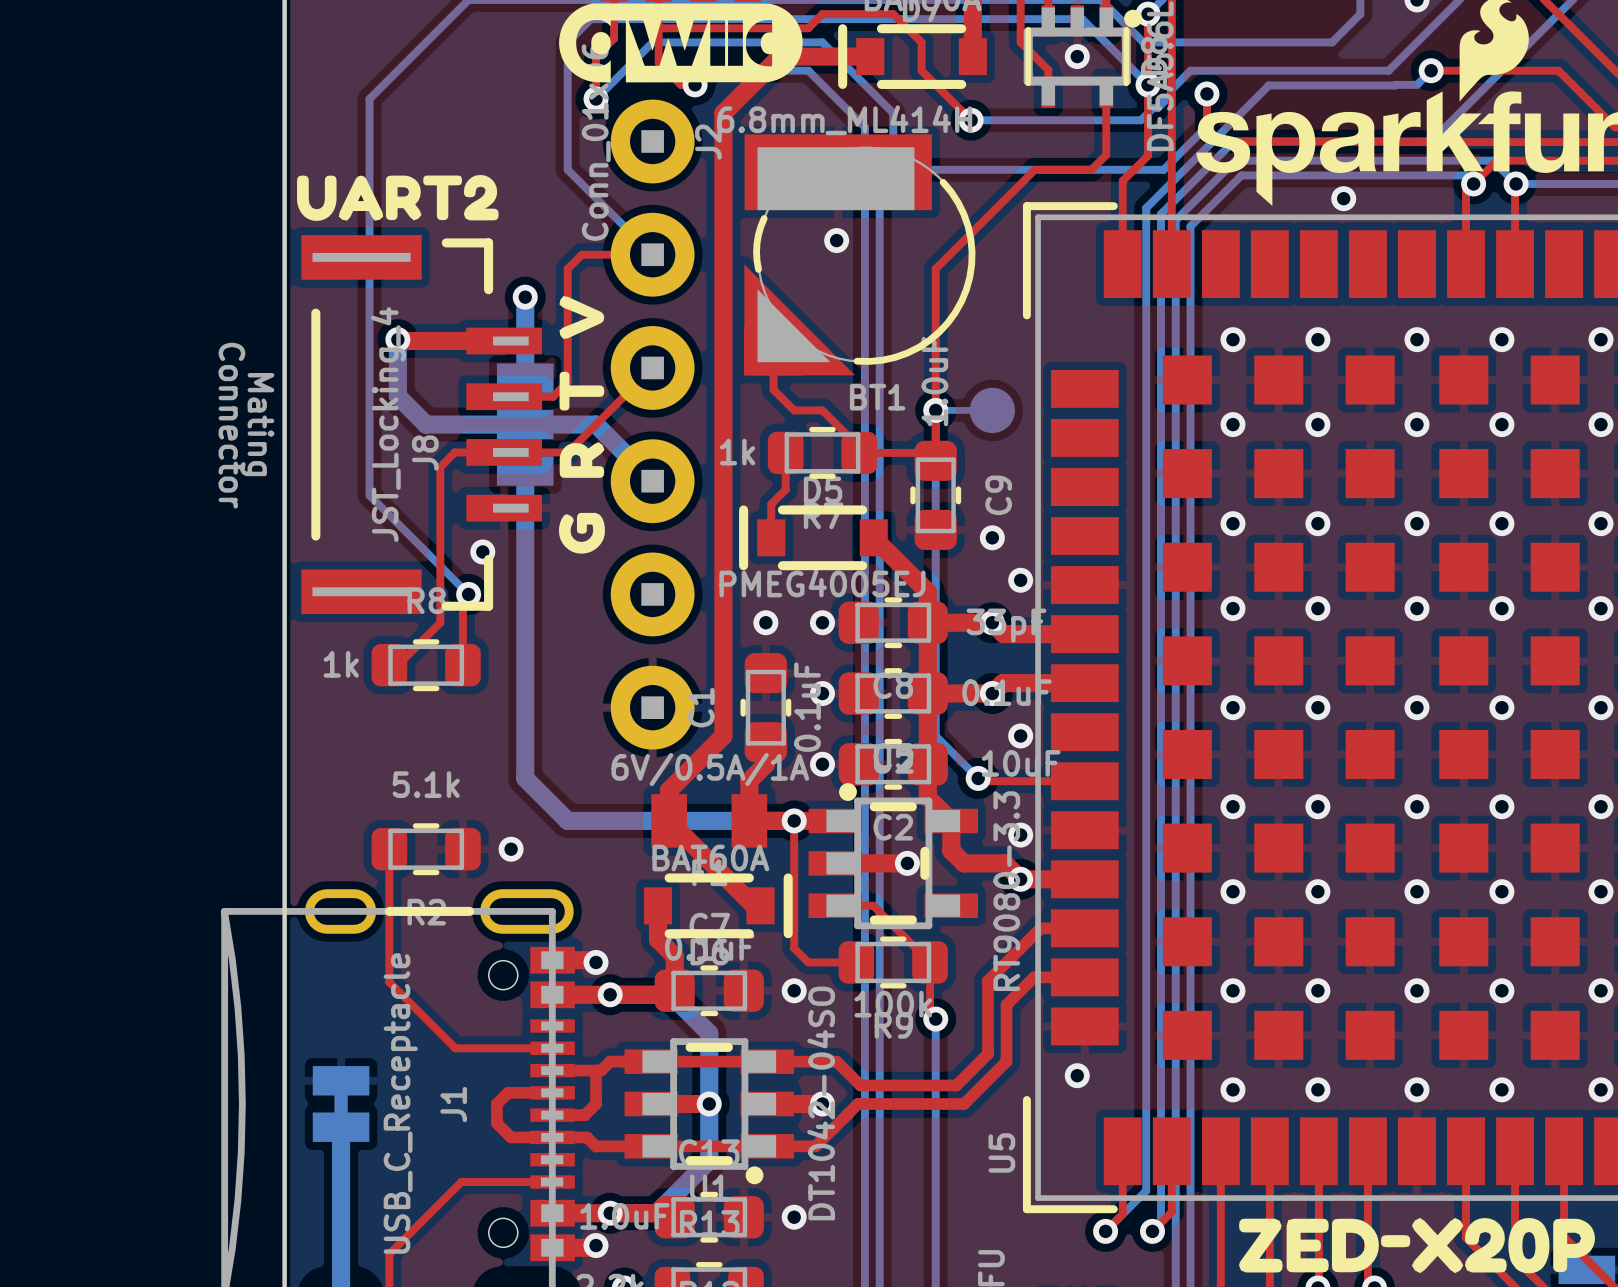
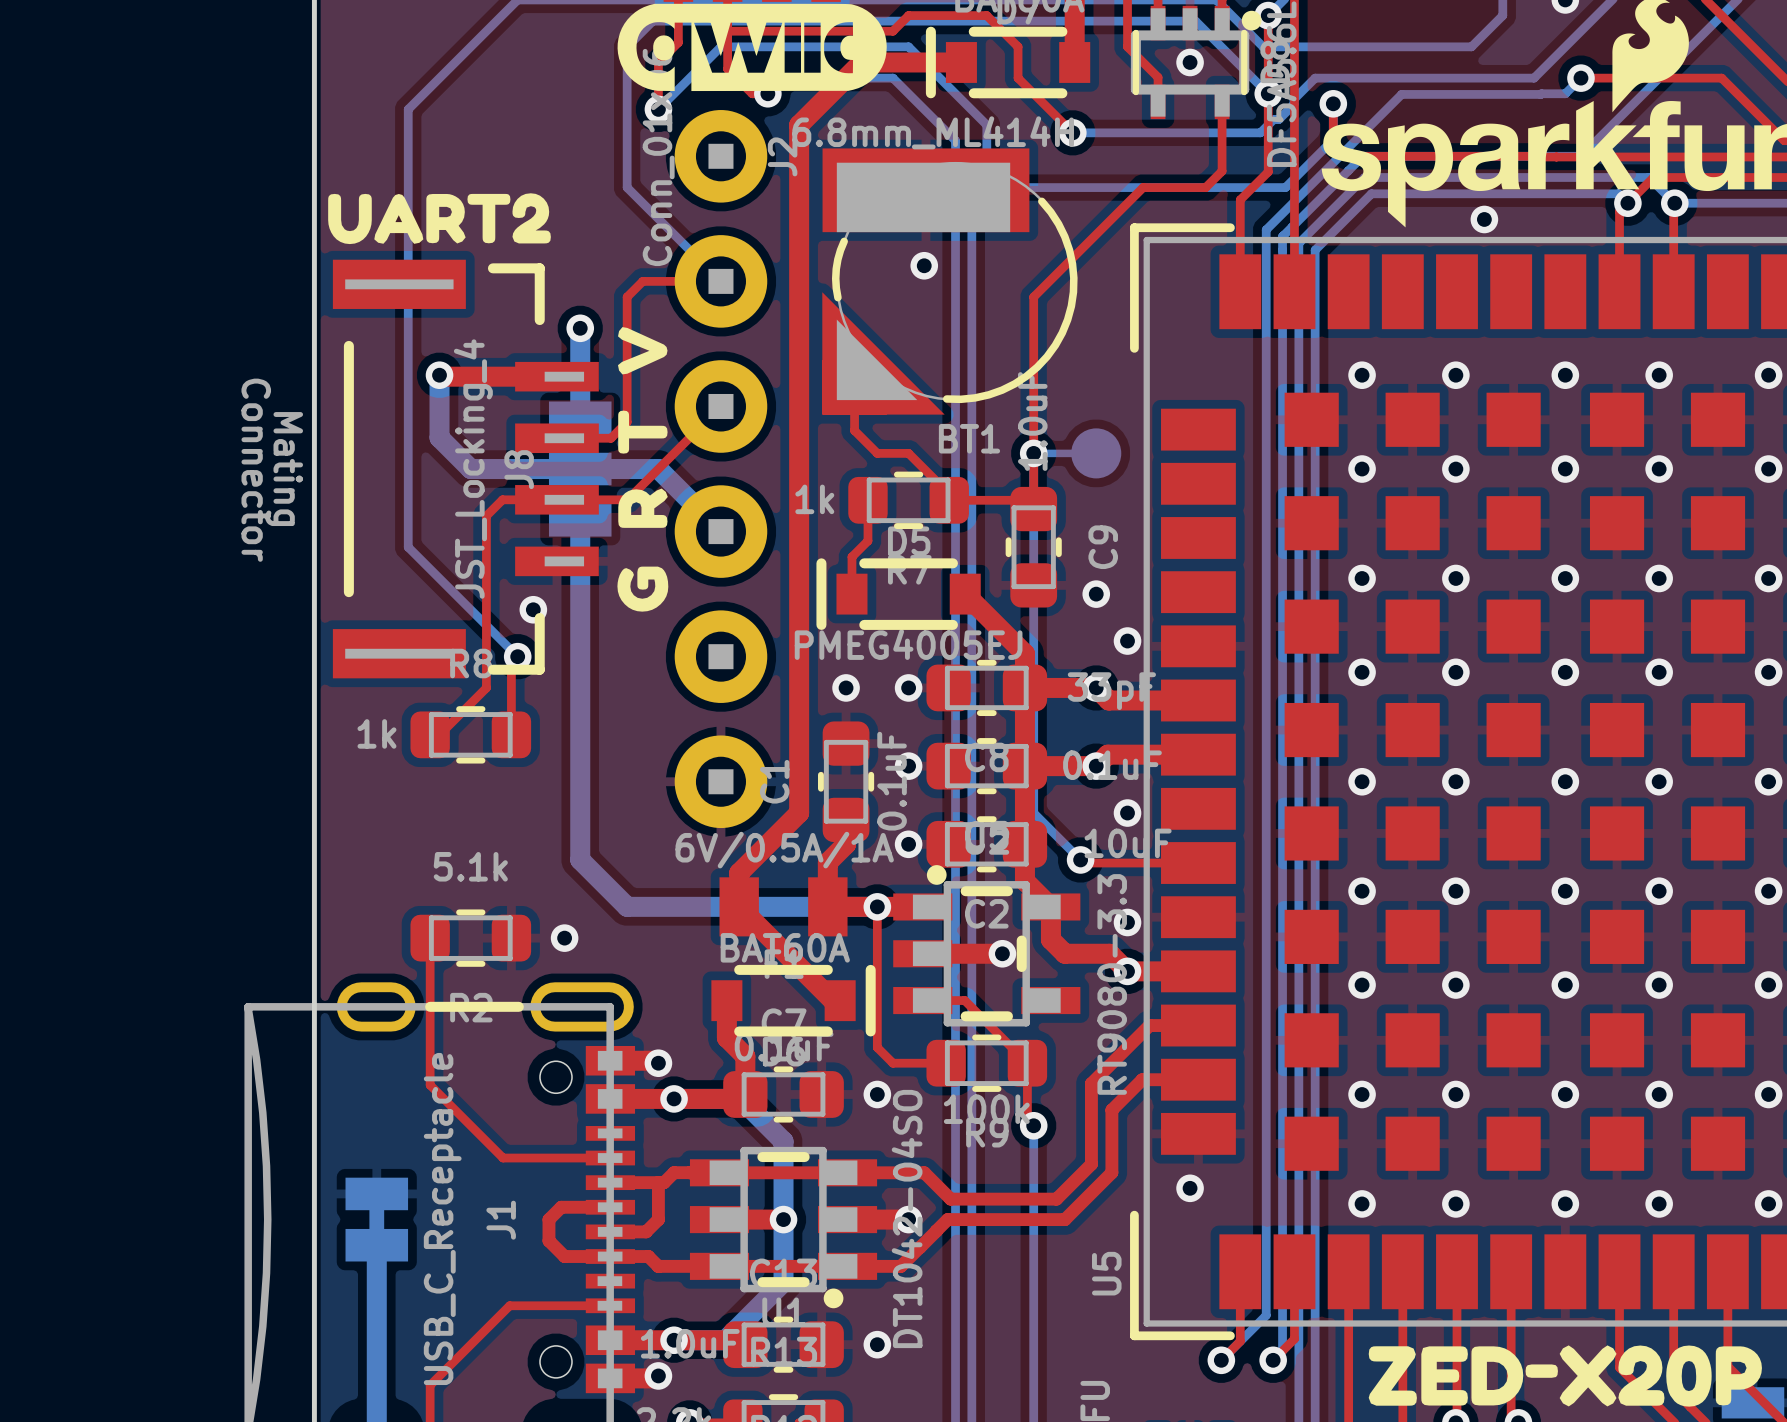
J8 value position: JST_Locking_4 (388, 424) -> JST_Locking_4 (473, 469)
J8 name position: J8 (425, 452) -> J8 (519, 469)

